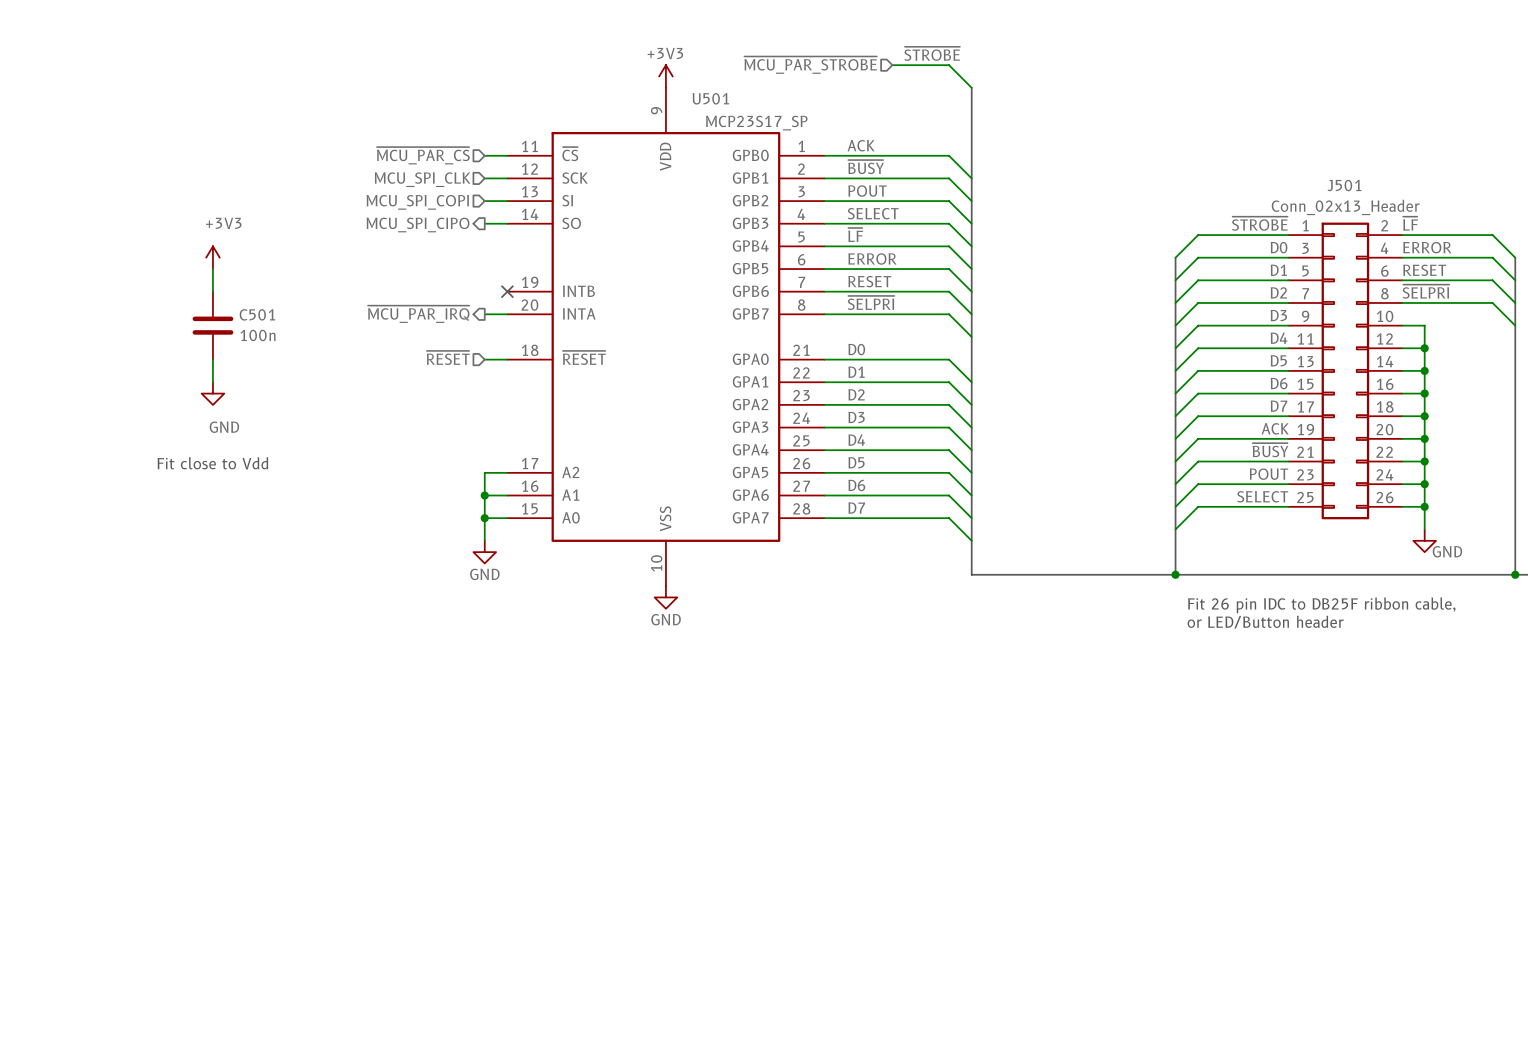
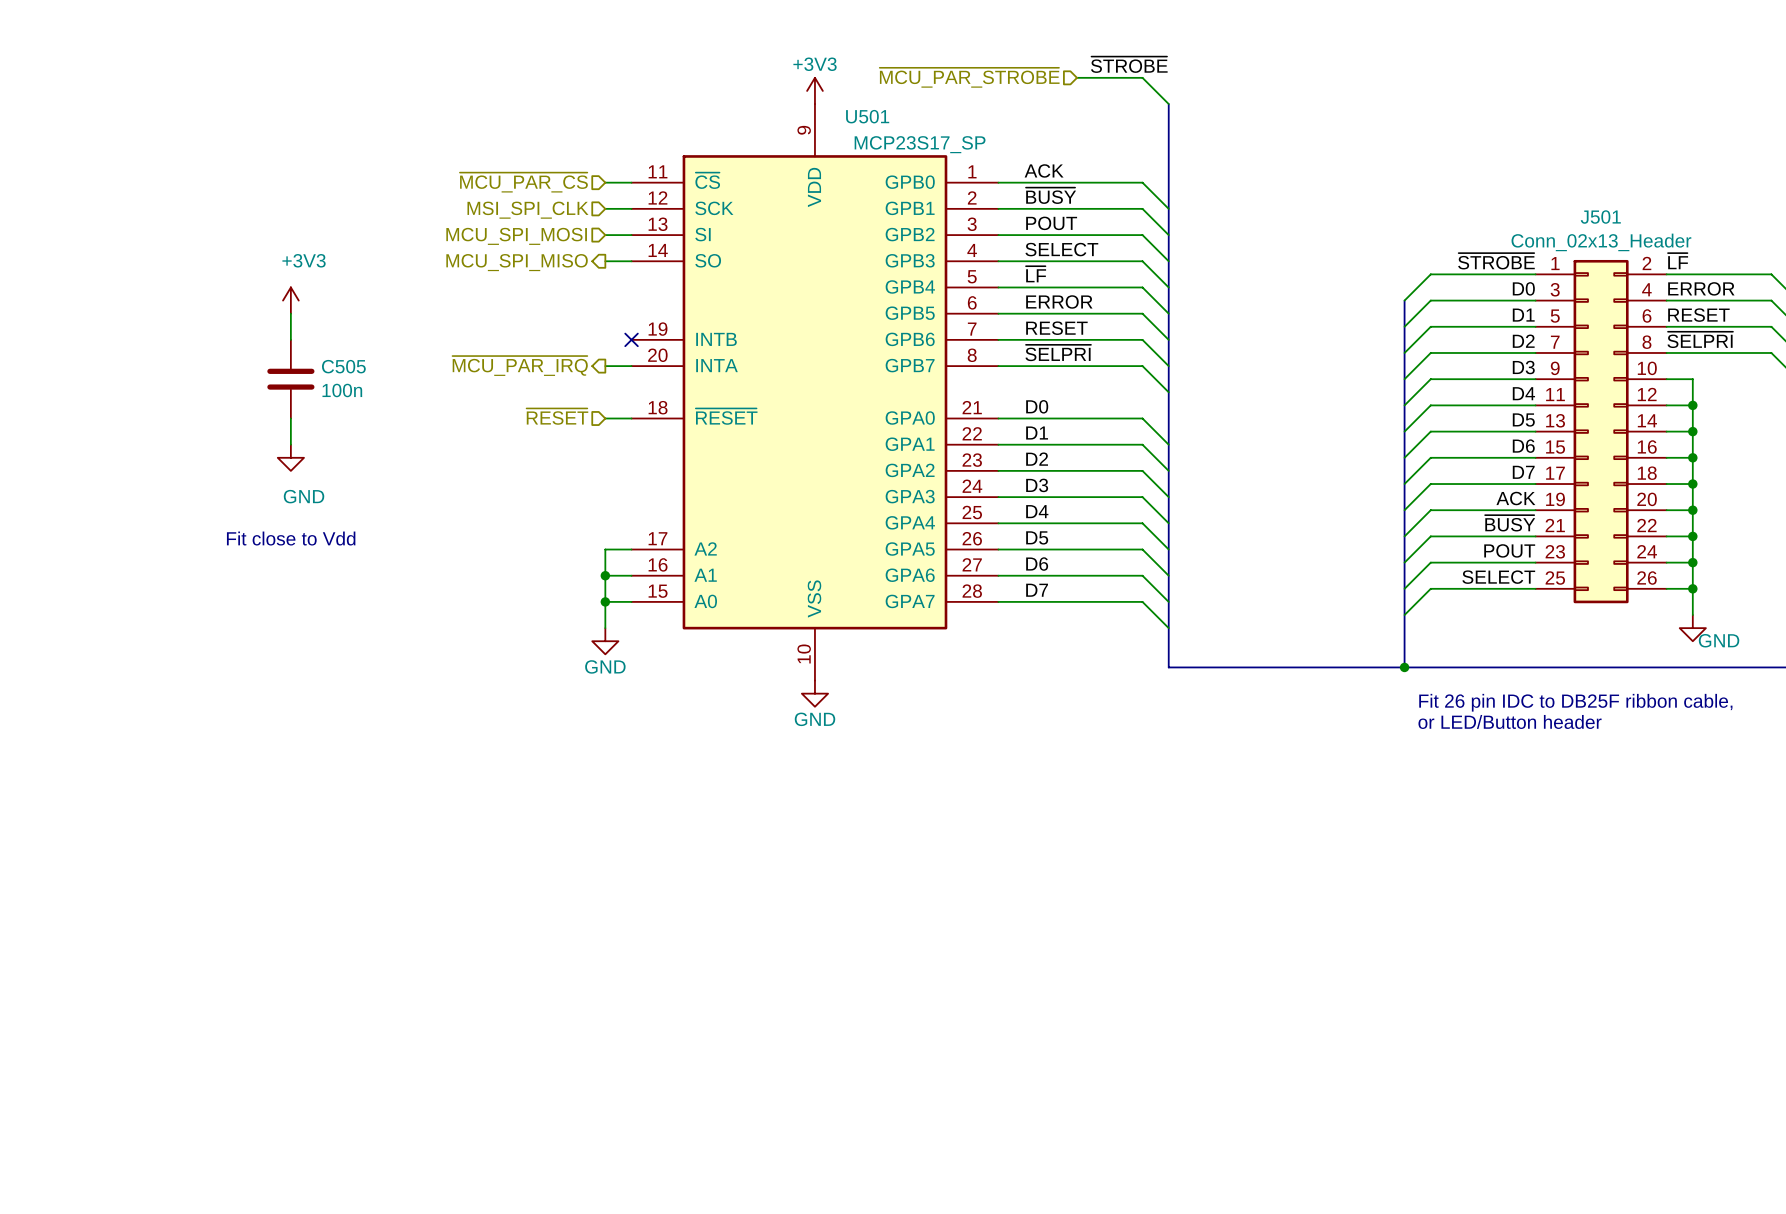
hierarchical label: MCU_SPI_CLK (422, 179) -> MSI_SPI_CLK (527, 210)
hierarchical label: MCU_SPI_COPI (417, 202) -> MCU_SPI_MOSI (516, 236)
hierarchical label: MCU_SPI_CIPO (418, 224) -> MCU_SPI_MISO (517, 262)
C501 name: C501 (257, 314) -> C505 (343, 366)

